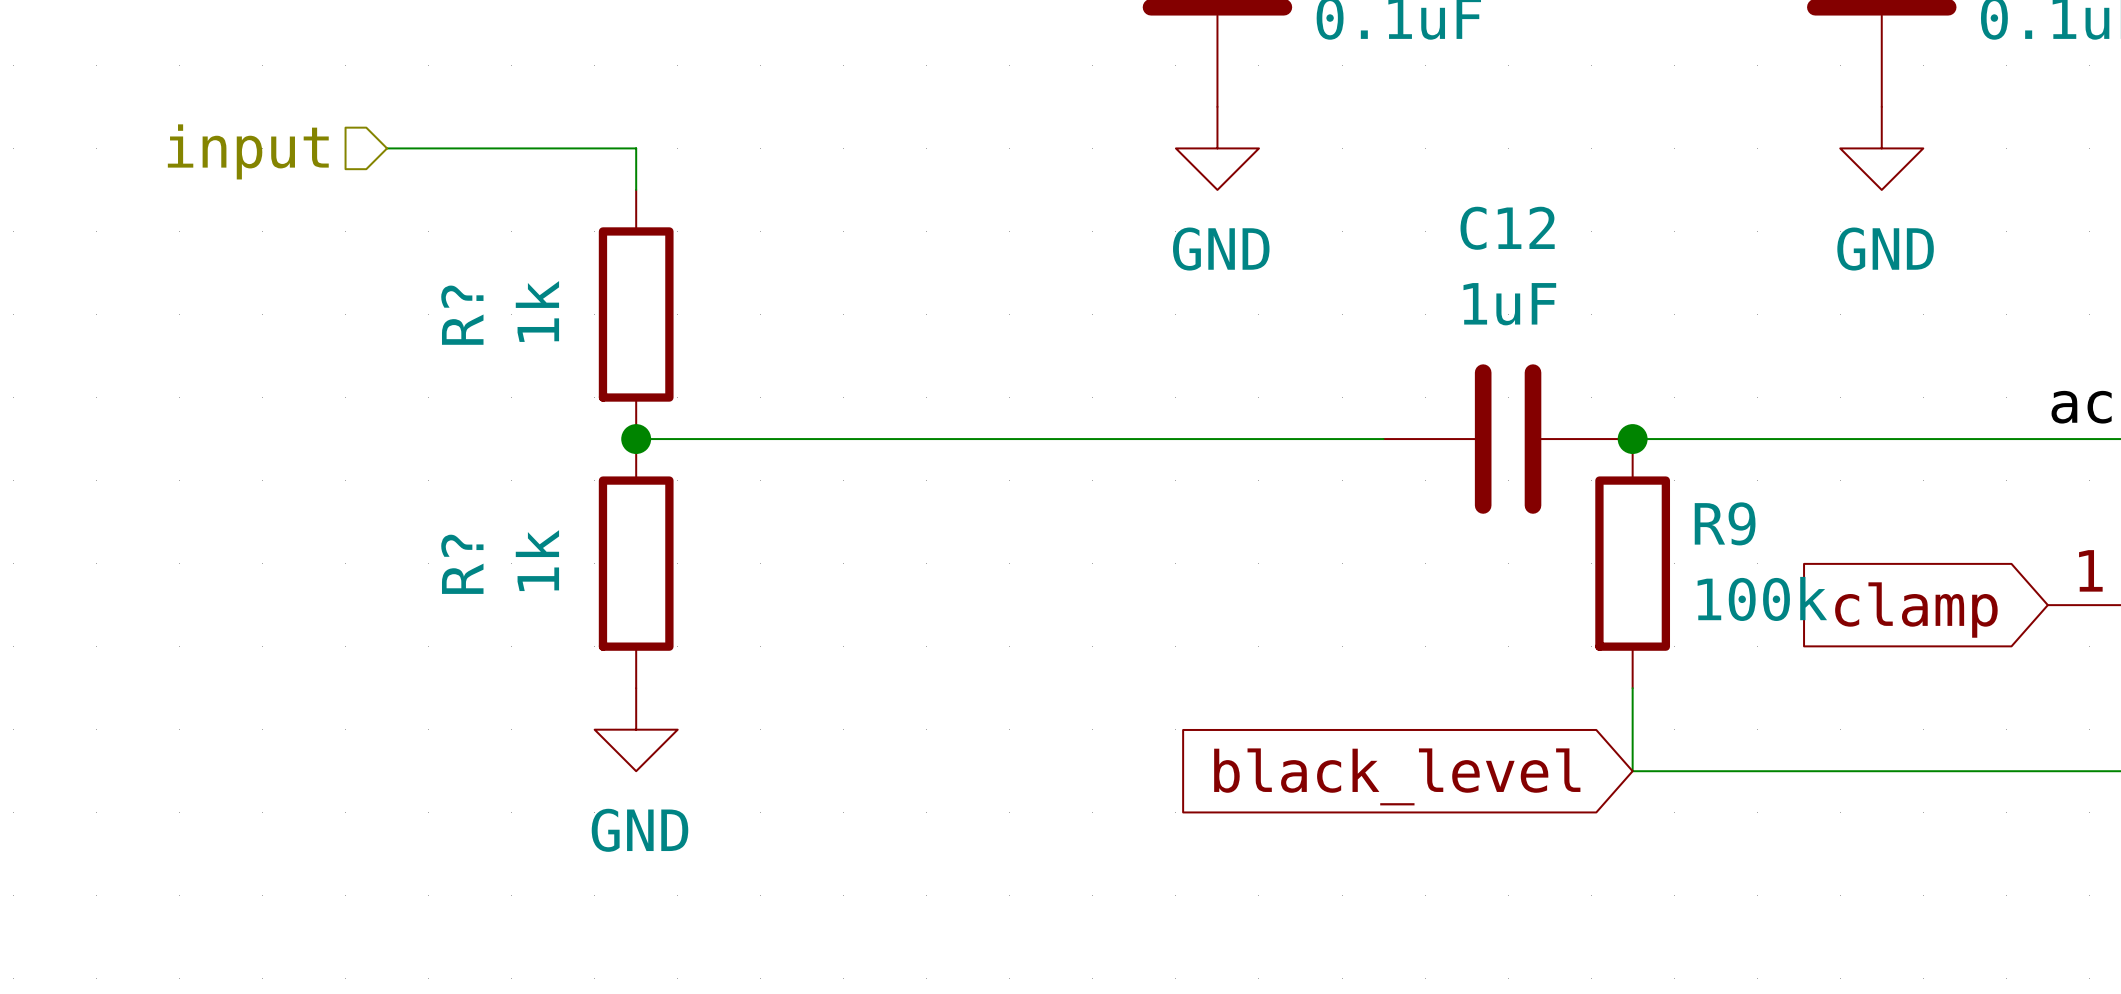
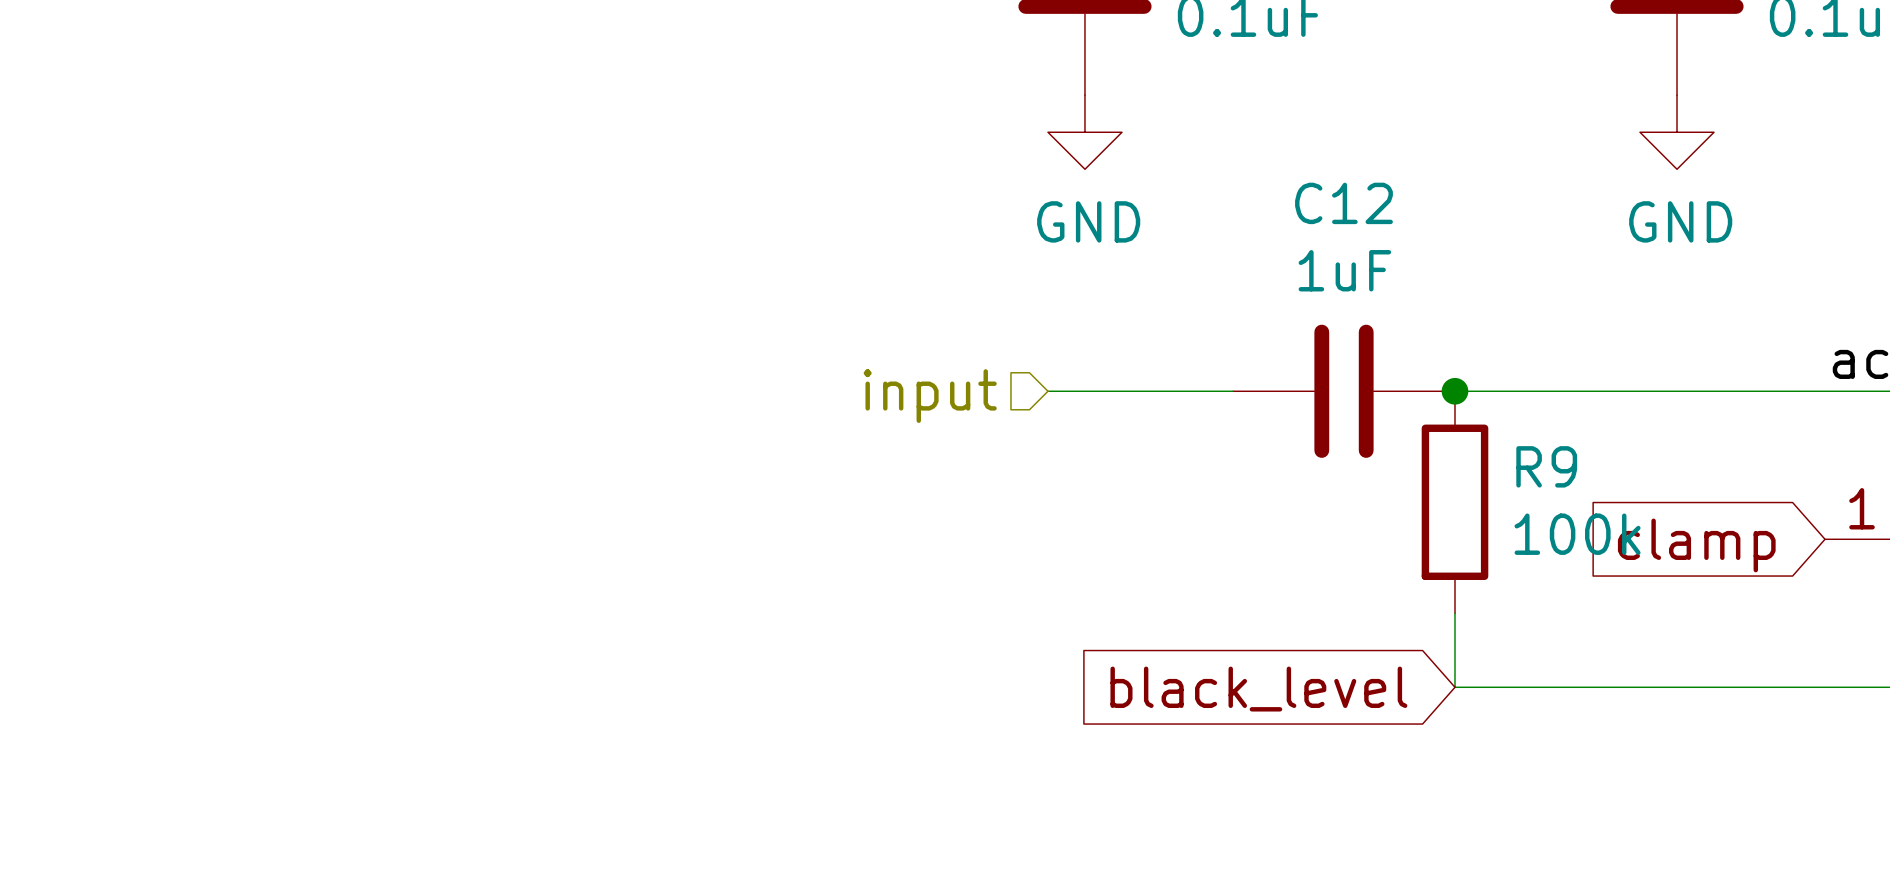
wire: (387, 148) (636, 148) (636, 189) -> none
hierarchical label: input (248, 151) -> none
R?: 1k (636, 314) -> none
wire: (636, 439) (1175, 439) -> none
junction: (636, 439) -> none
hierarchical label: none -> input (930, 396)
R?: 1k (636, 563) -> none
power symbol: GND (636, 729) -> none

